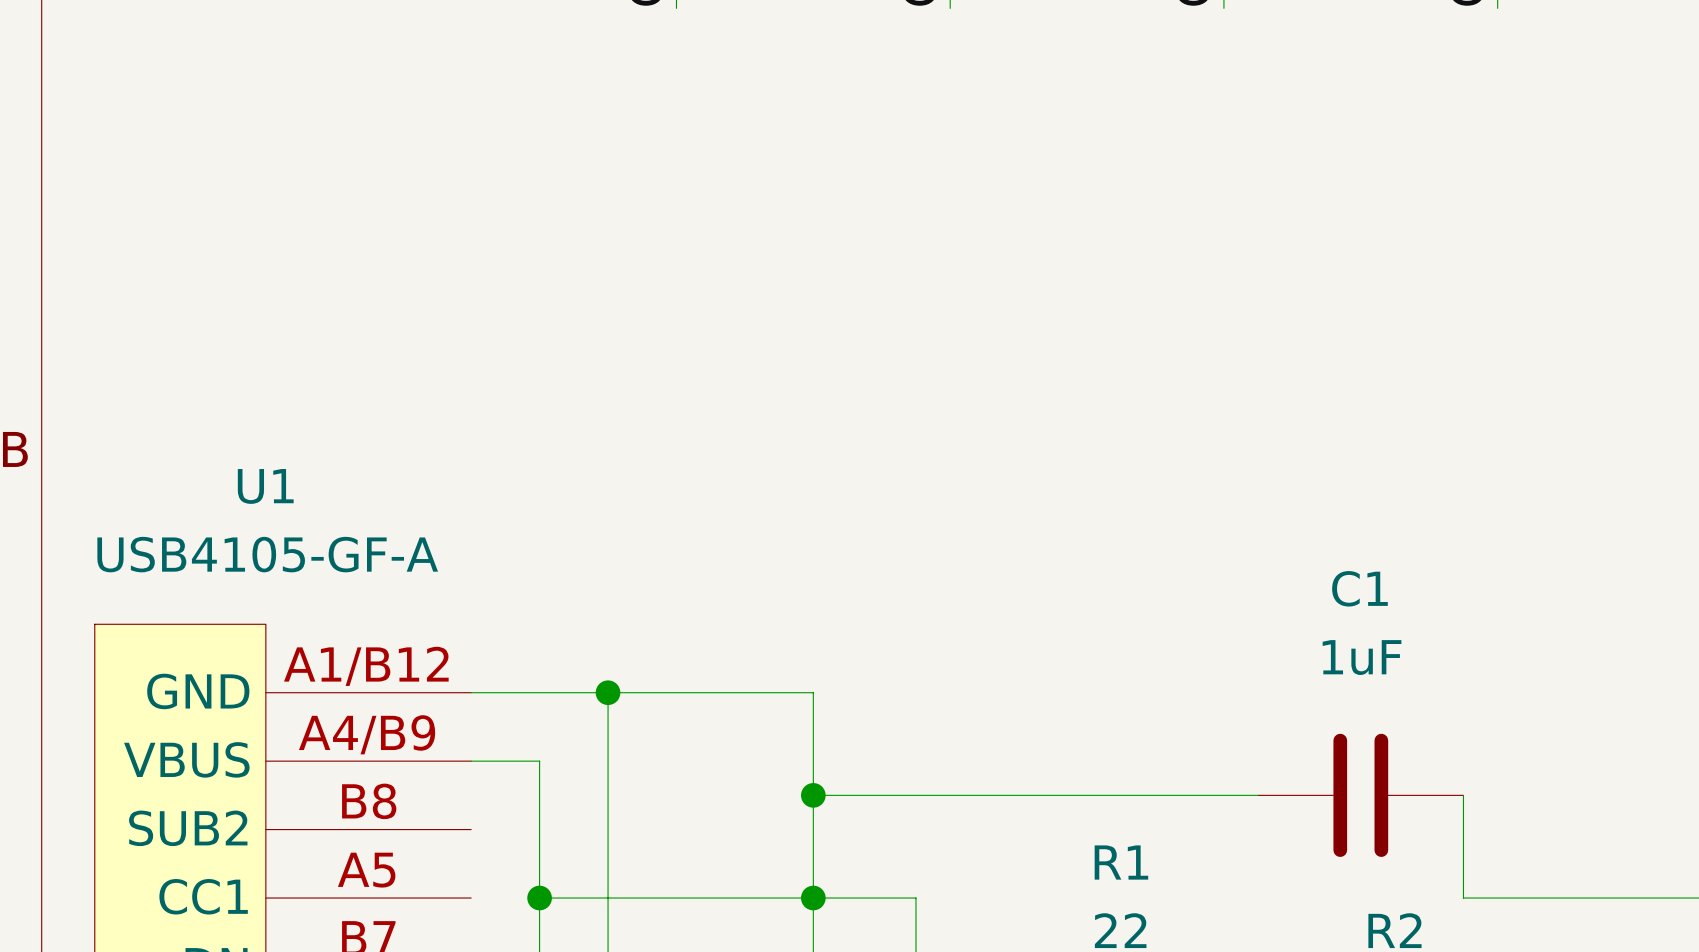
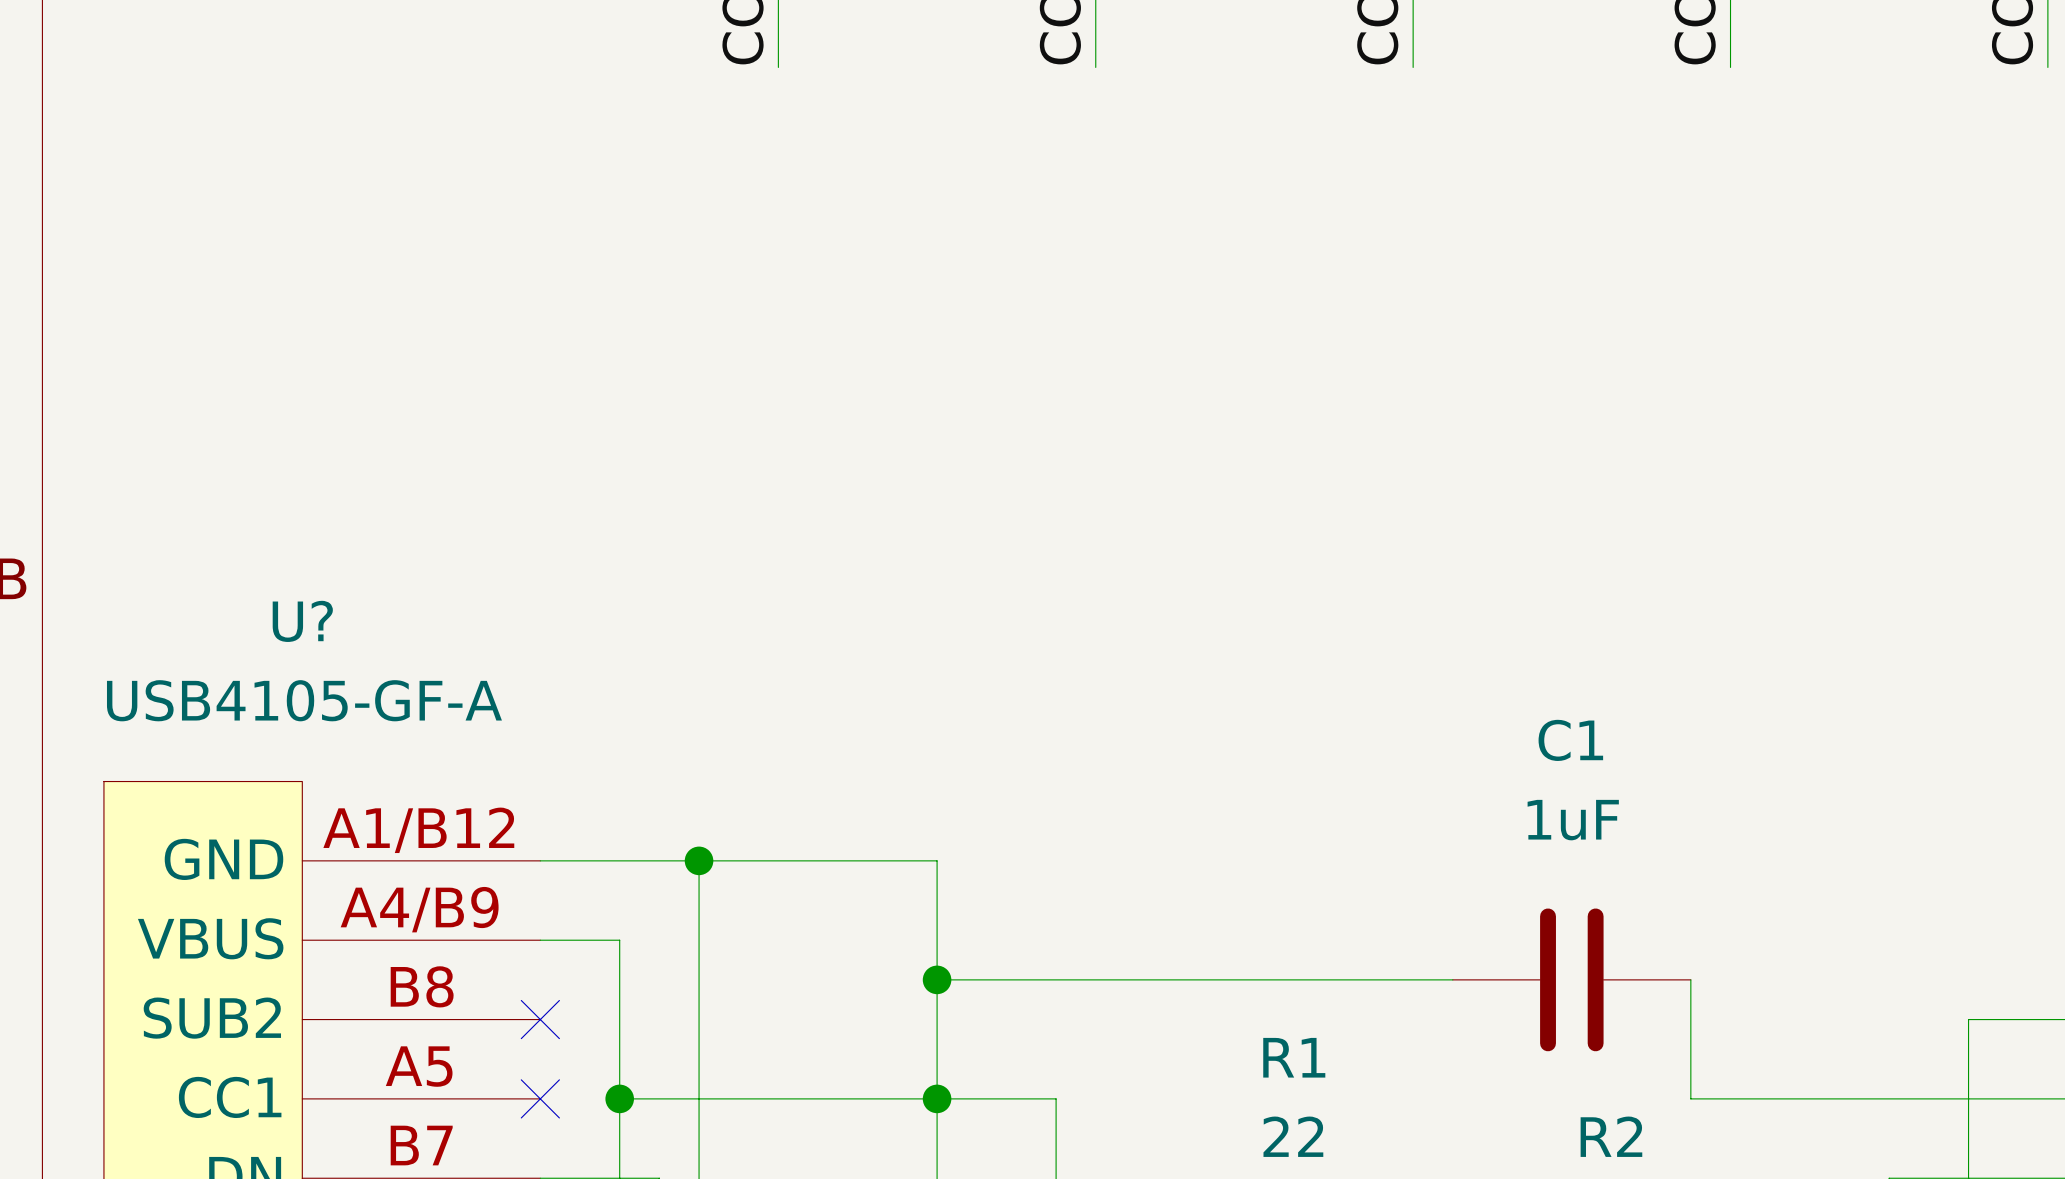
U1 name: U1 (265, 486) -> U? (302, 621)
no-connect mark: none -> (540, 1019)
no-connect mark: none -> (540, 1098)

